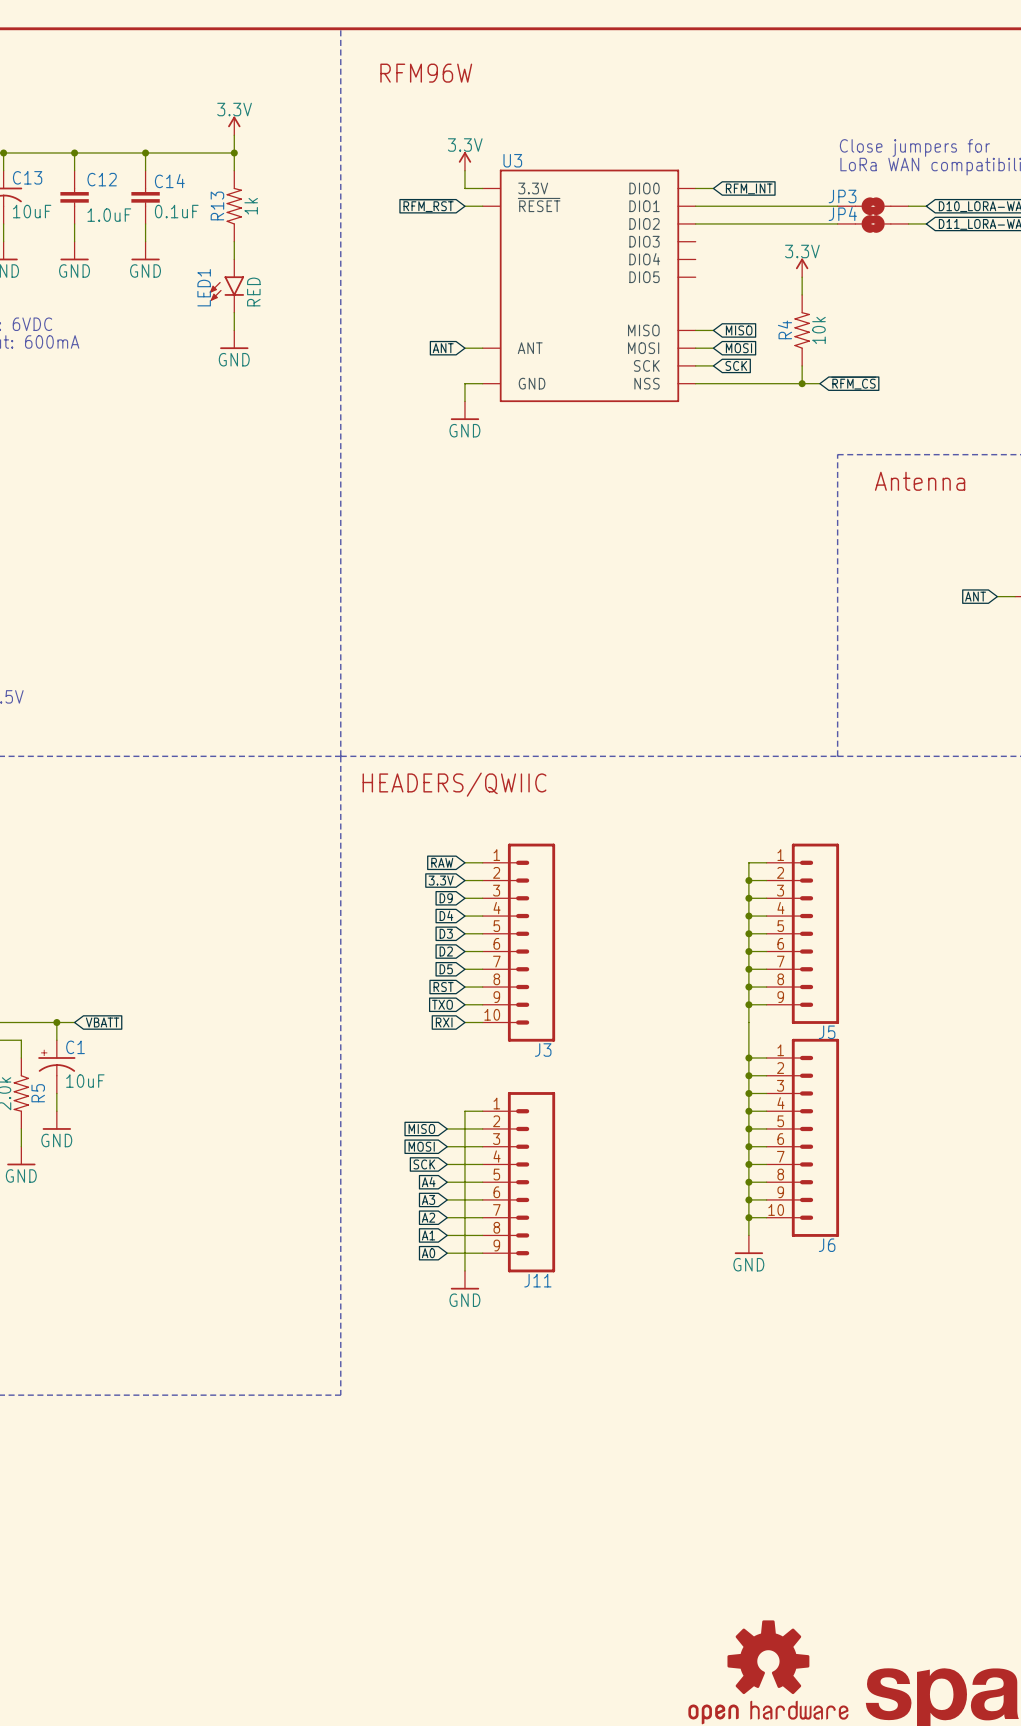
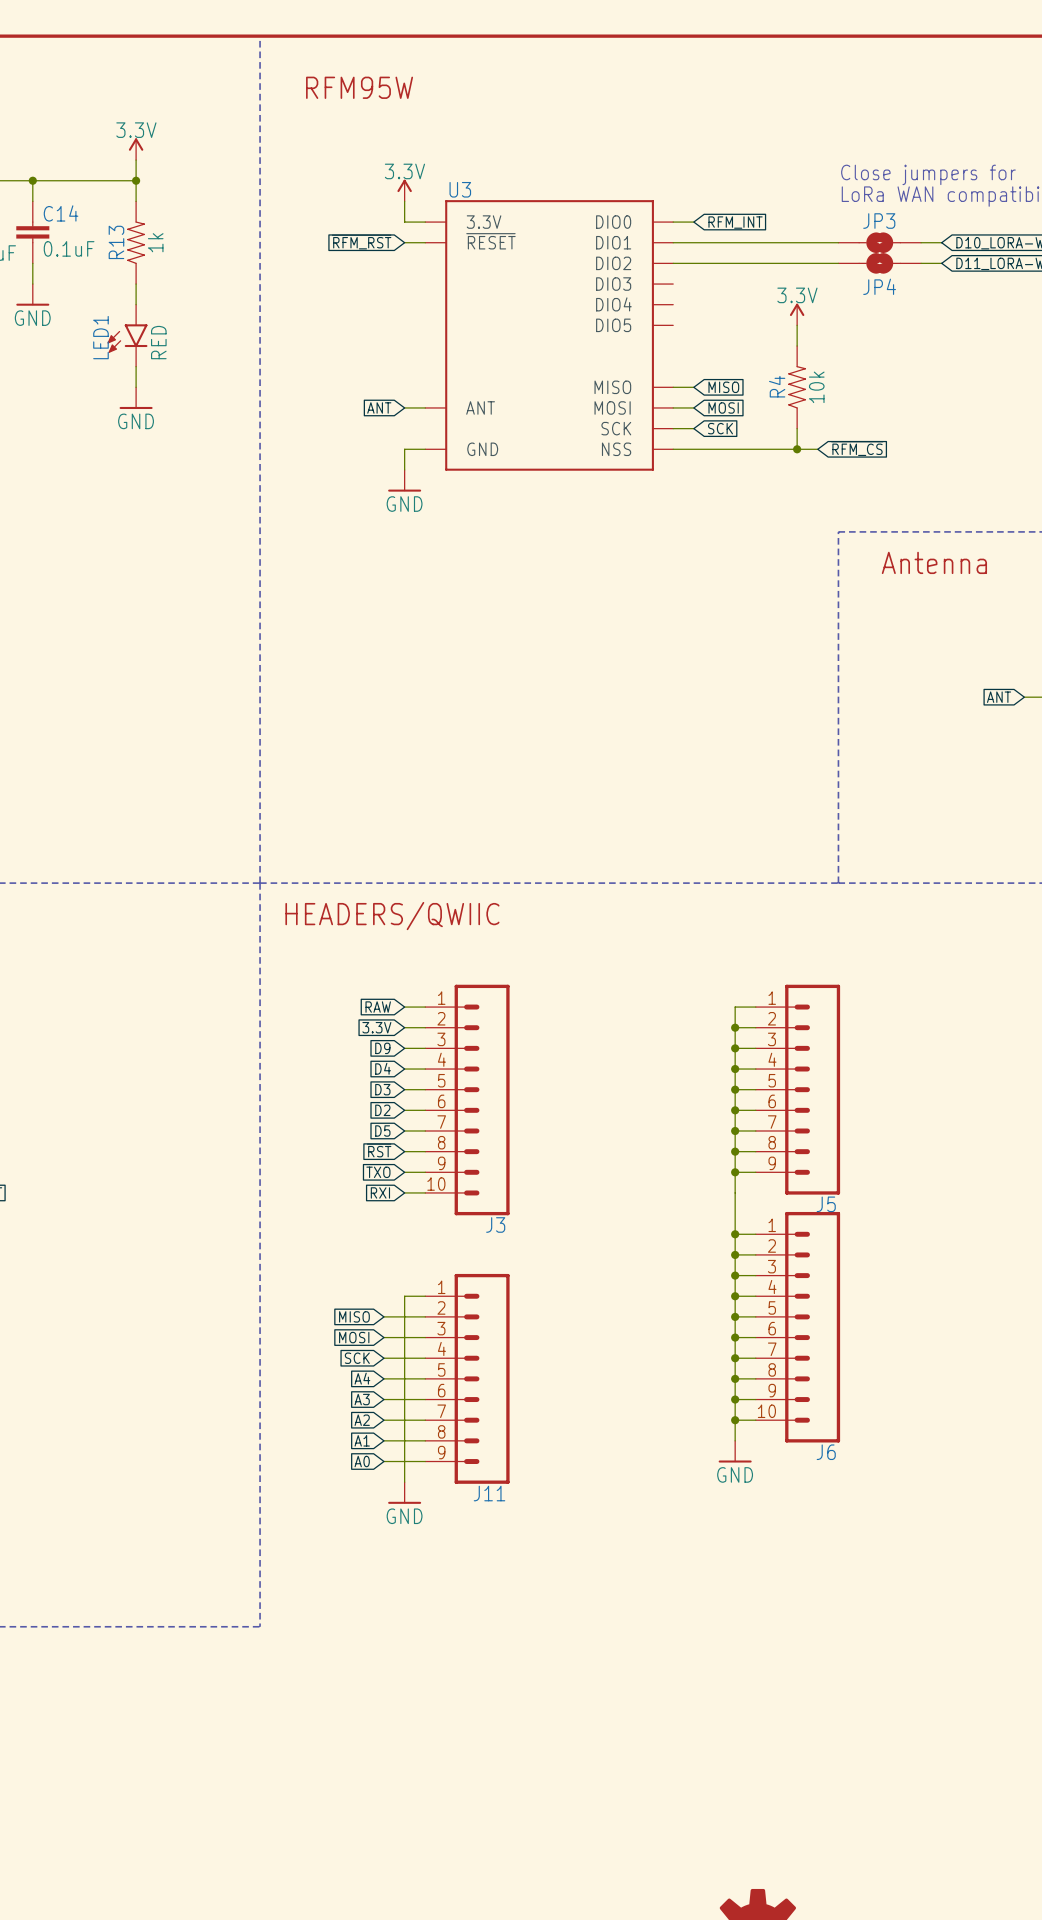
text: RFM96W (426, 73) -> RFM95W (359, 87)
JP3 name position: JP3 (842, 196) -> JP3 (879, 221)
JP4 name position: JP4 (842, 213) -> JP4 (879, 286)

